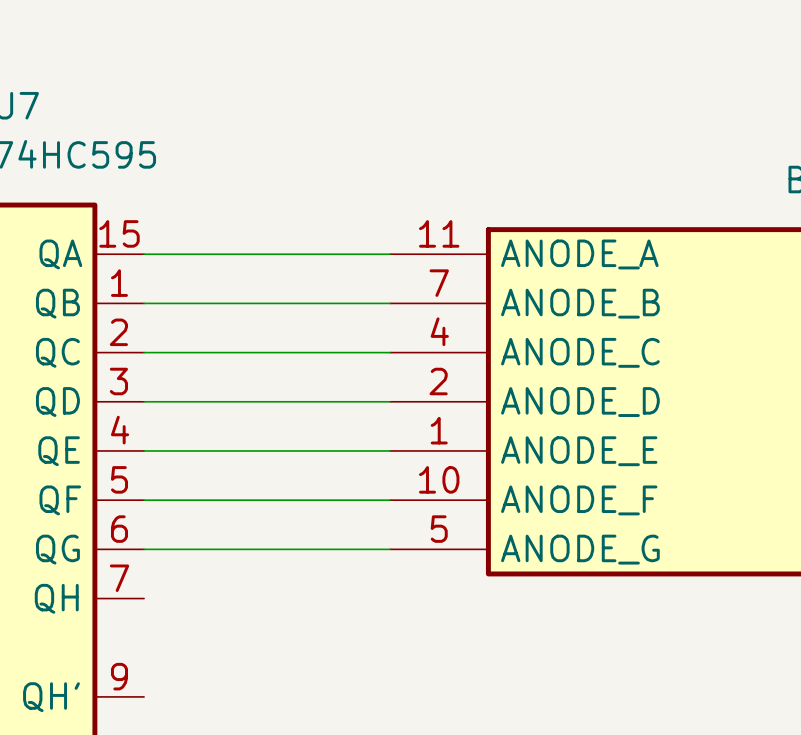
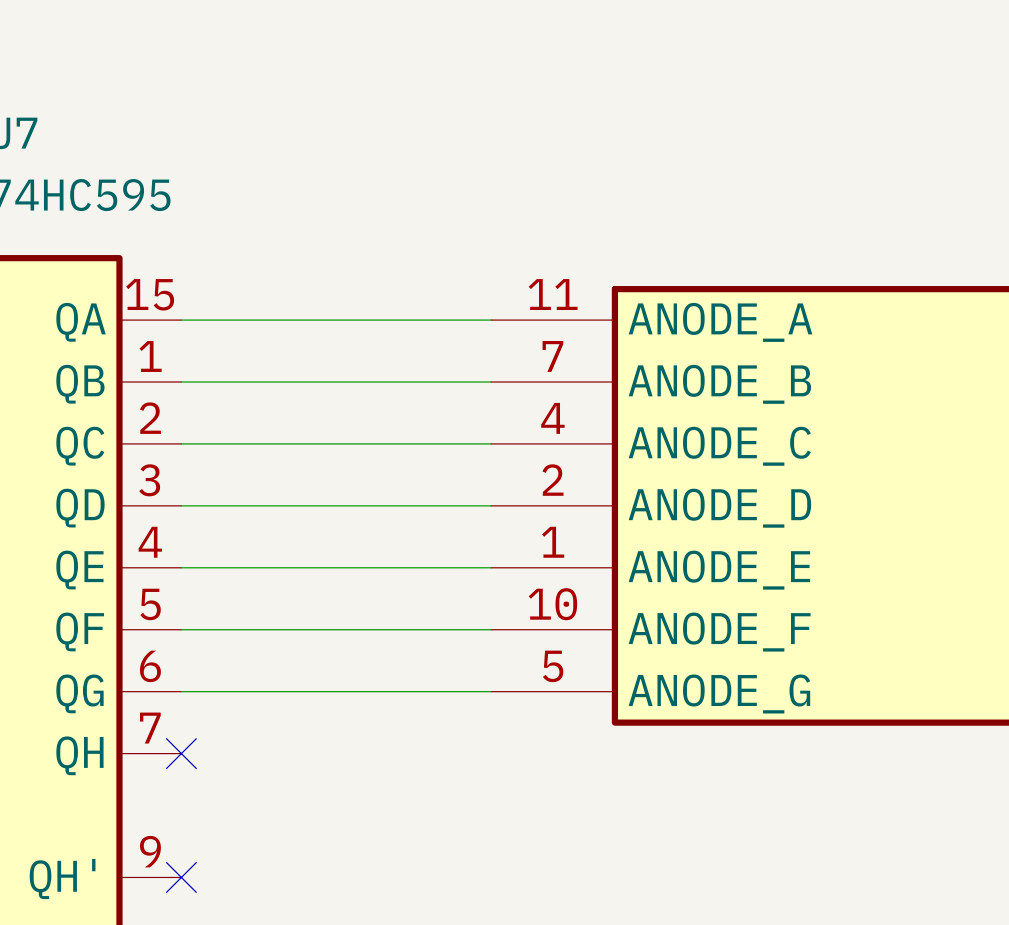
no-connect mark: none -> (181, 753)
no-connect mark: none -> (181, 877)

